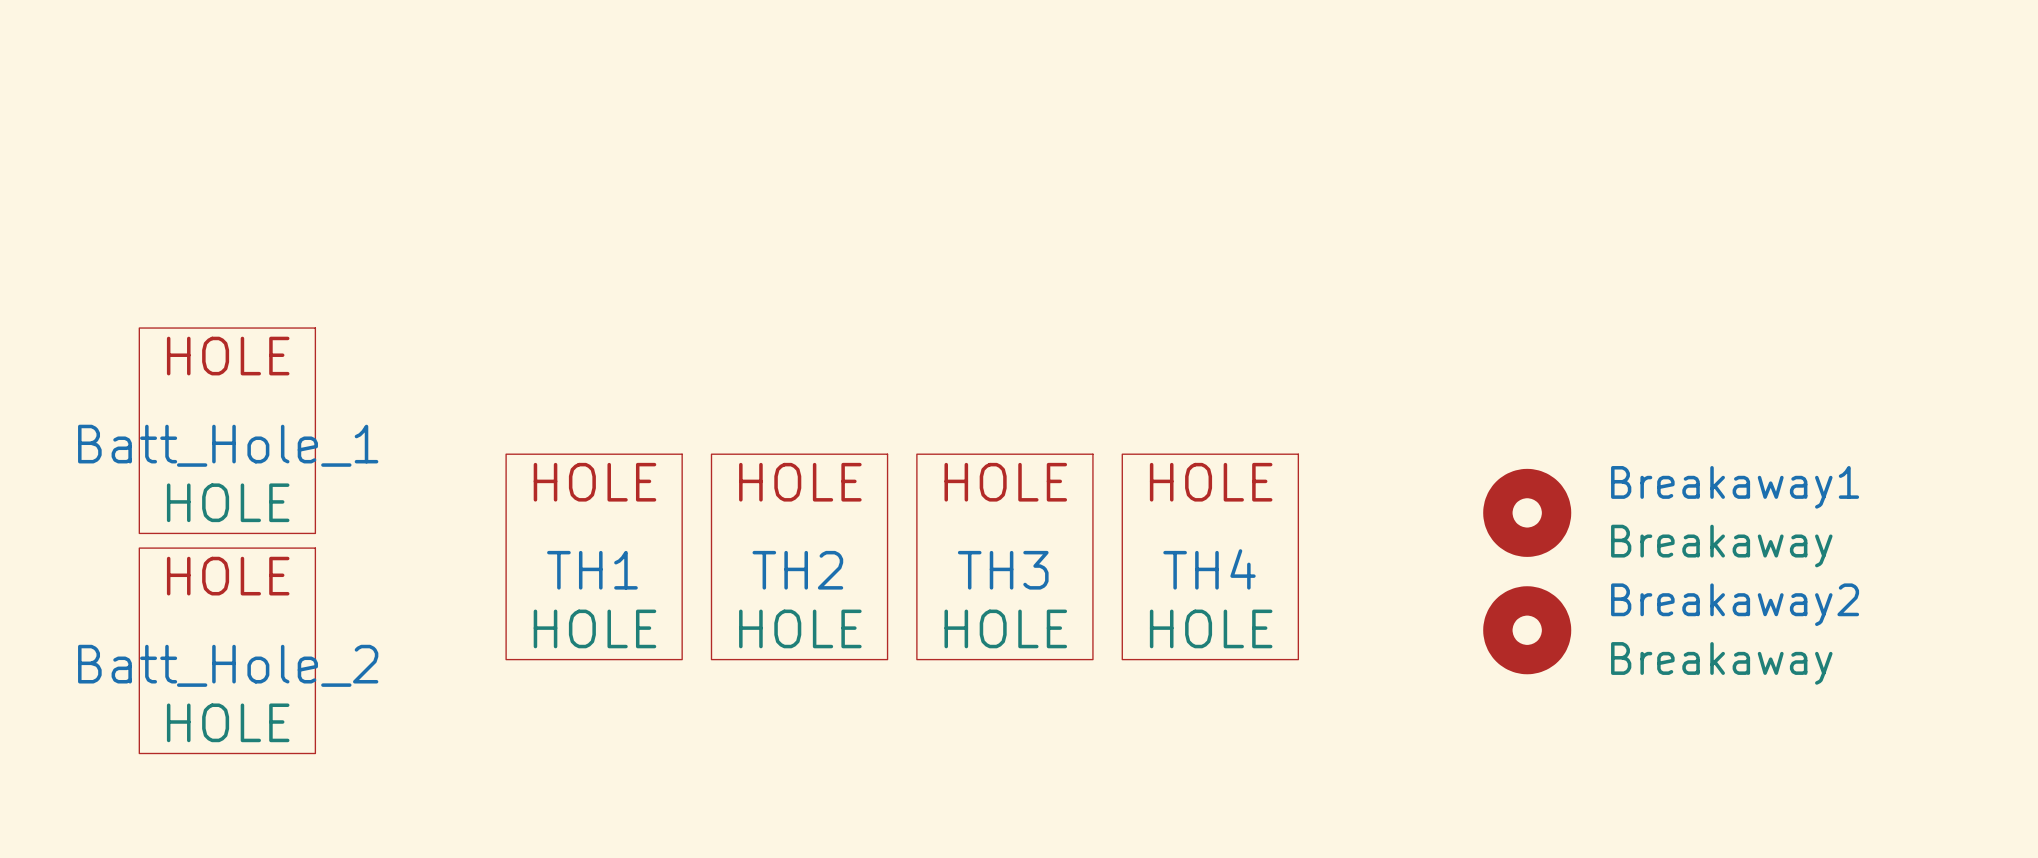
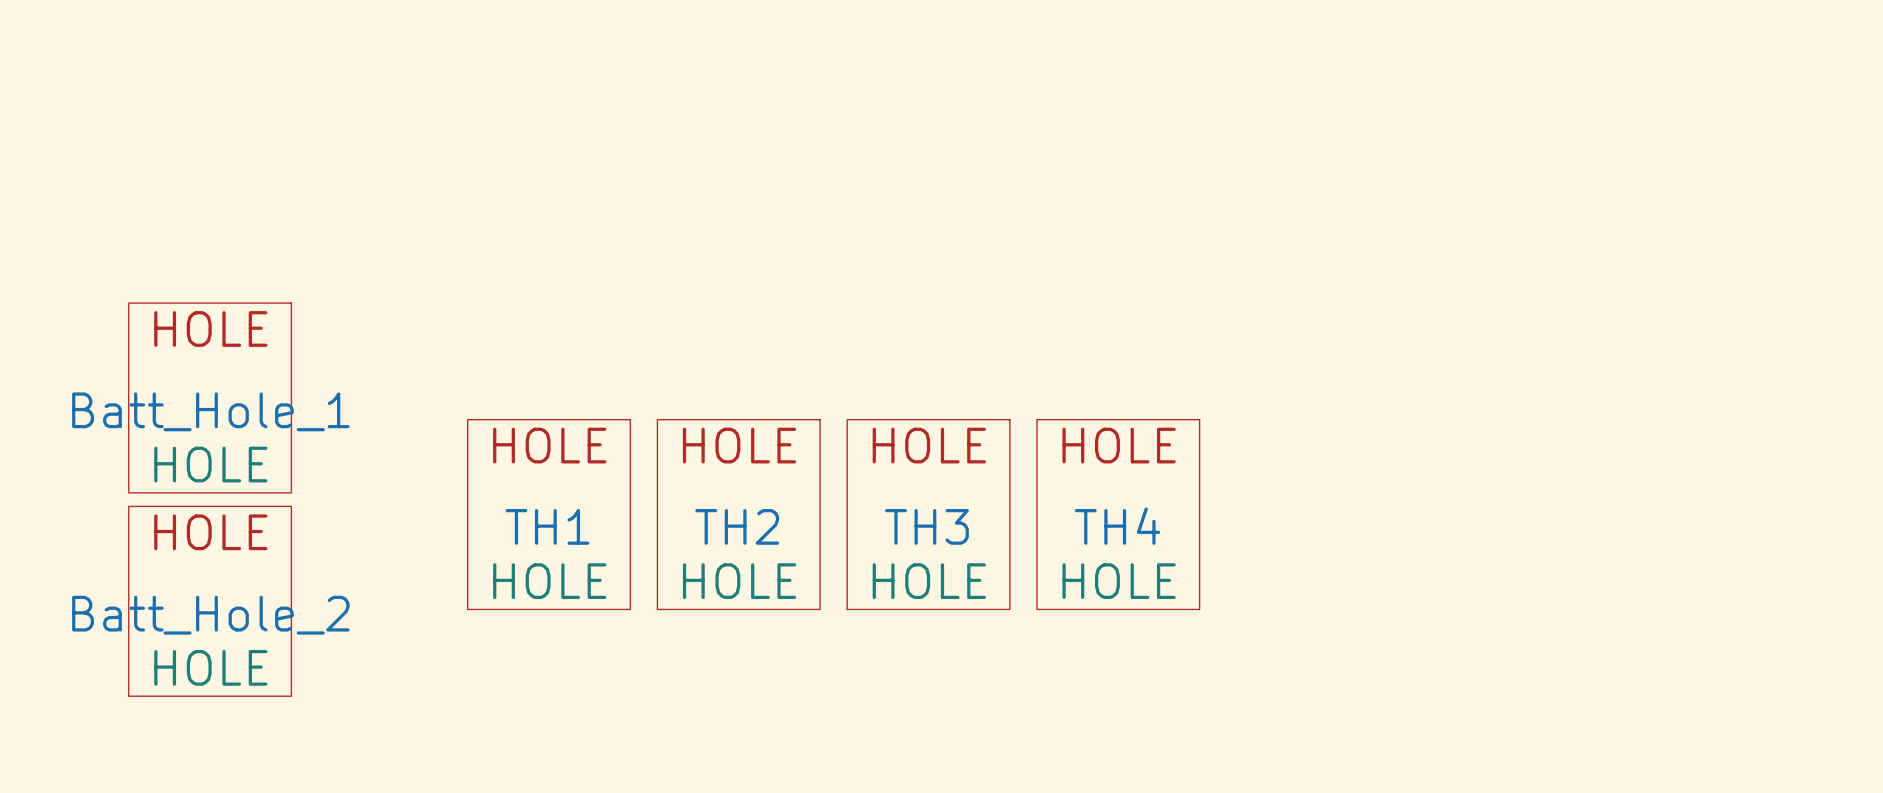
Breakaway1: Breakaway (1527, 512) -> none
Breakaway2: Breakaway (1527, 630) -> none

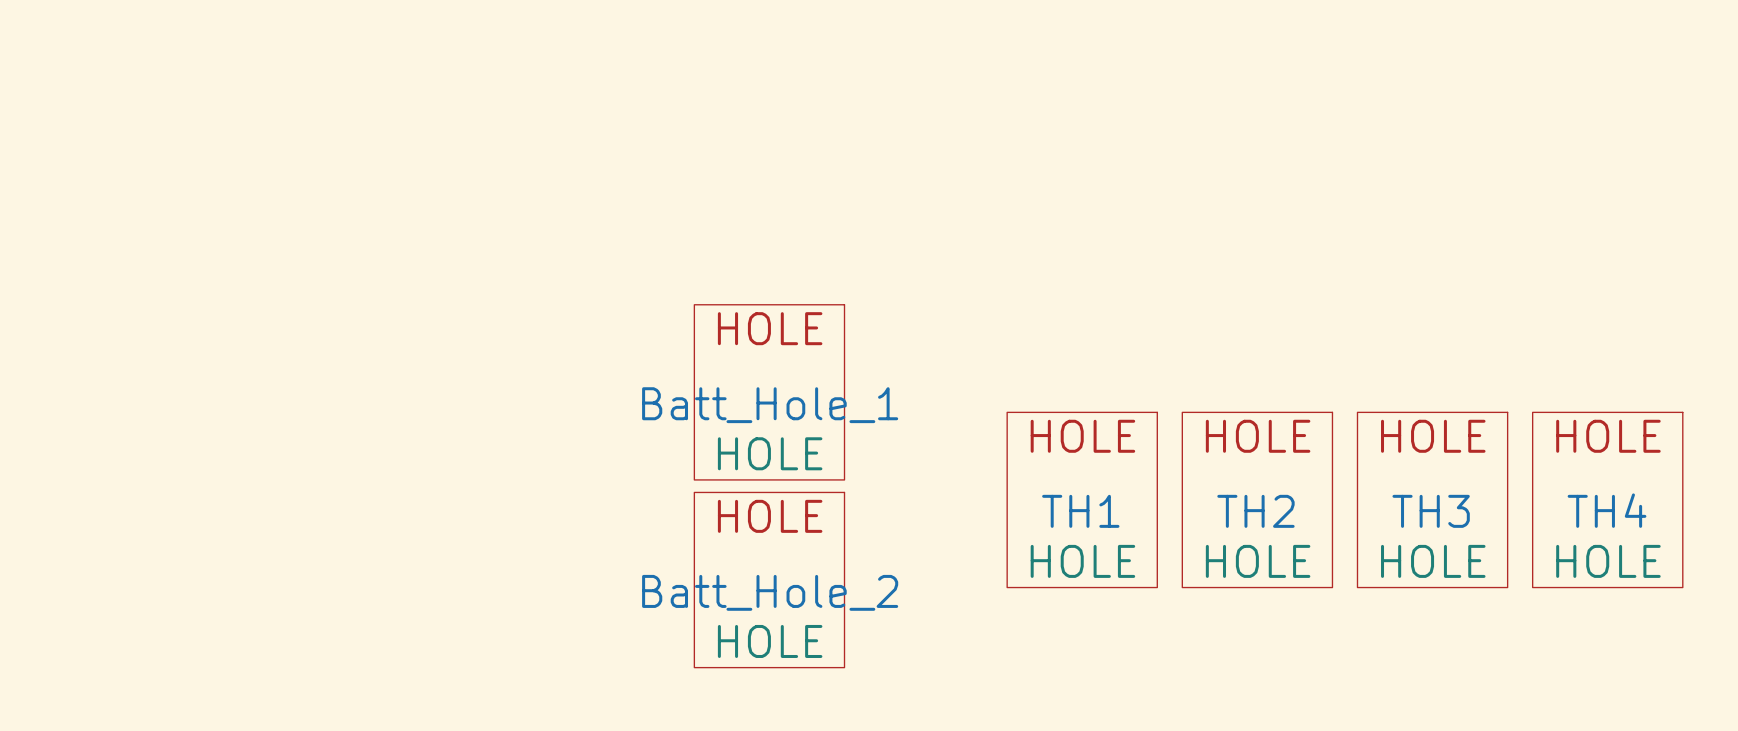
Batt_Hole_1 position: (210, 397) -> (769, 392)
TH1 position: (548, 514) -> (1082, 499)
TH2 position: (738, 514) -> (1257, 499)
TH3 position: (928, 514) -> (1432, 499)
TH4 position: (1118, 514) -> (1607, 499)
Batt_Hole_2 position: (210, 601) -> (769, 580)

